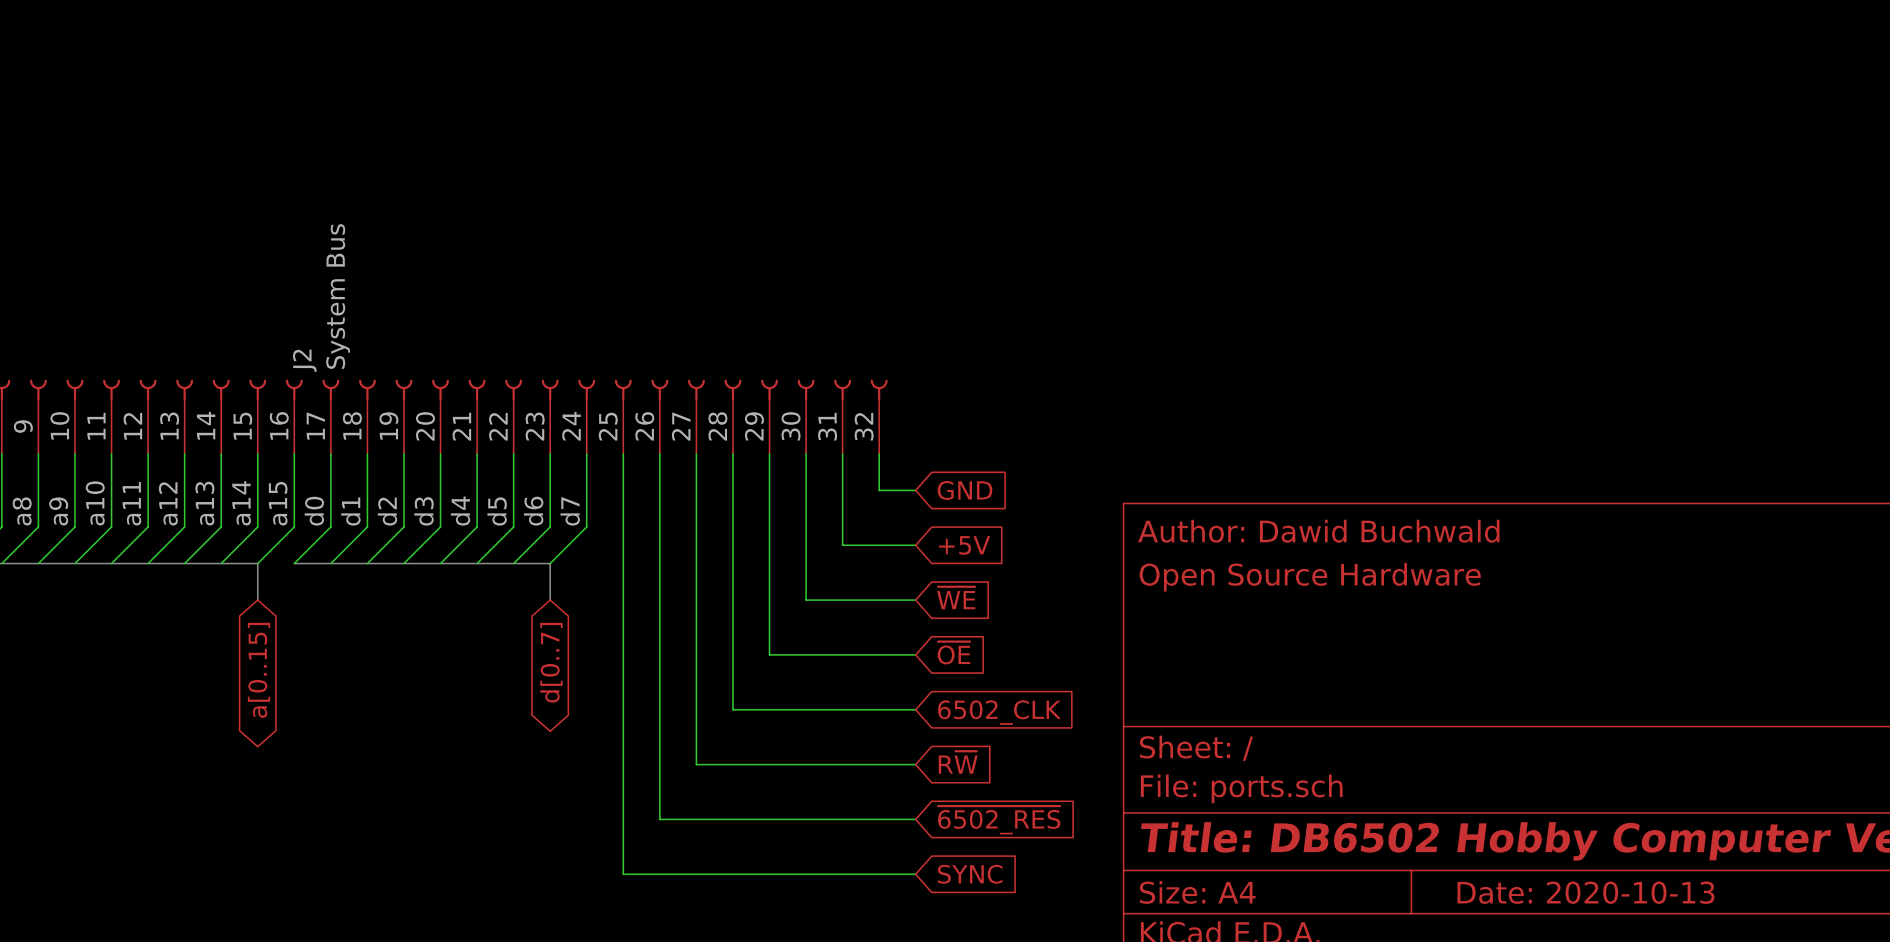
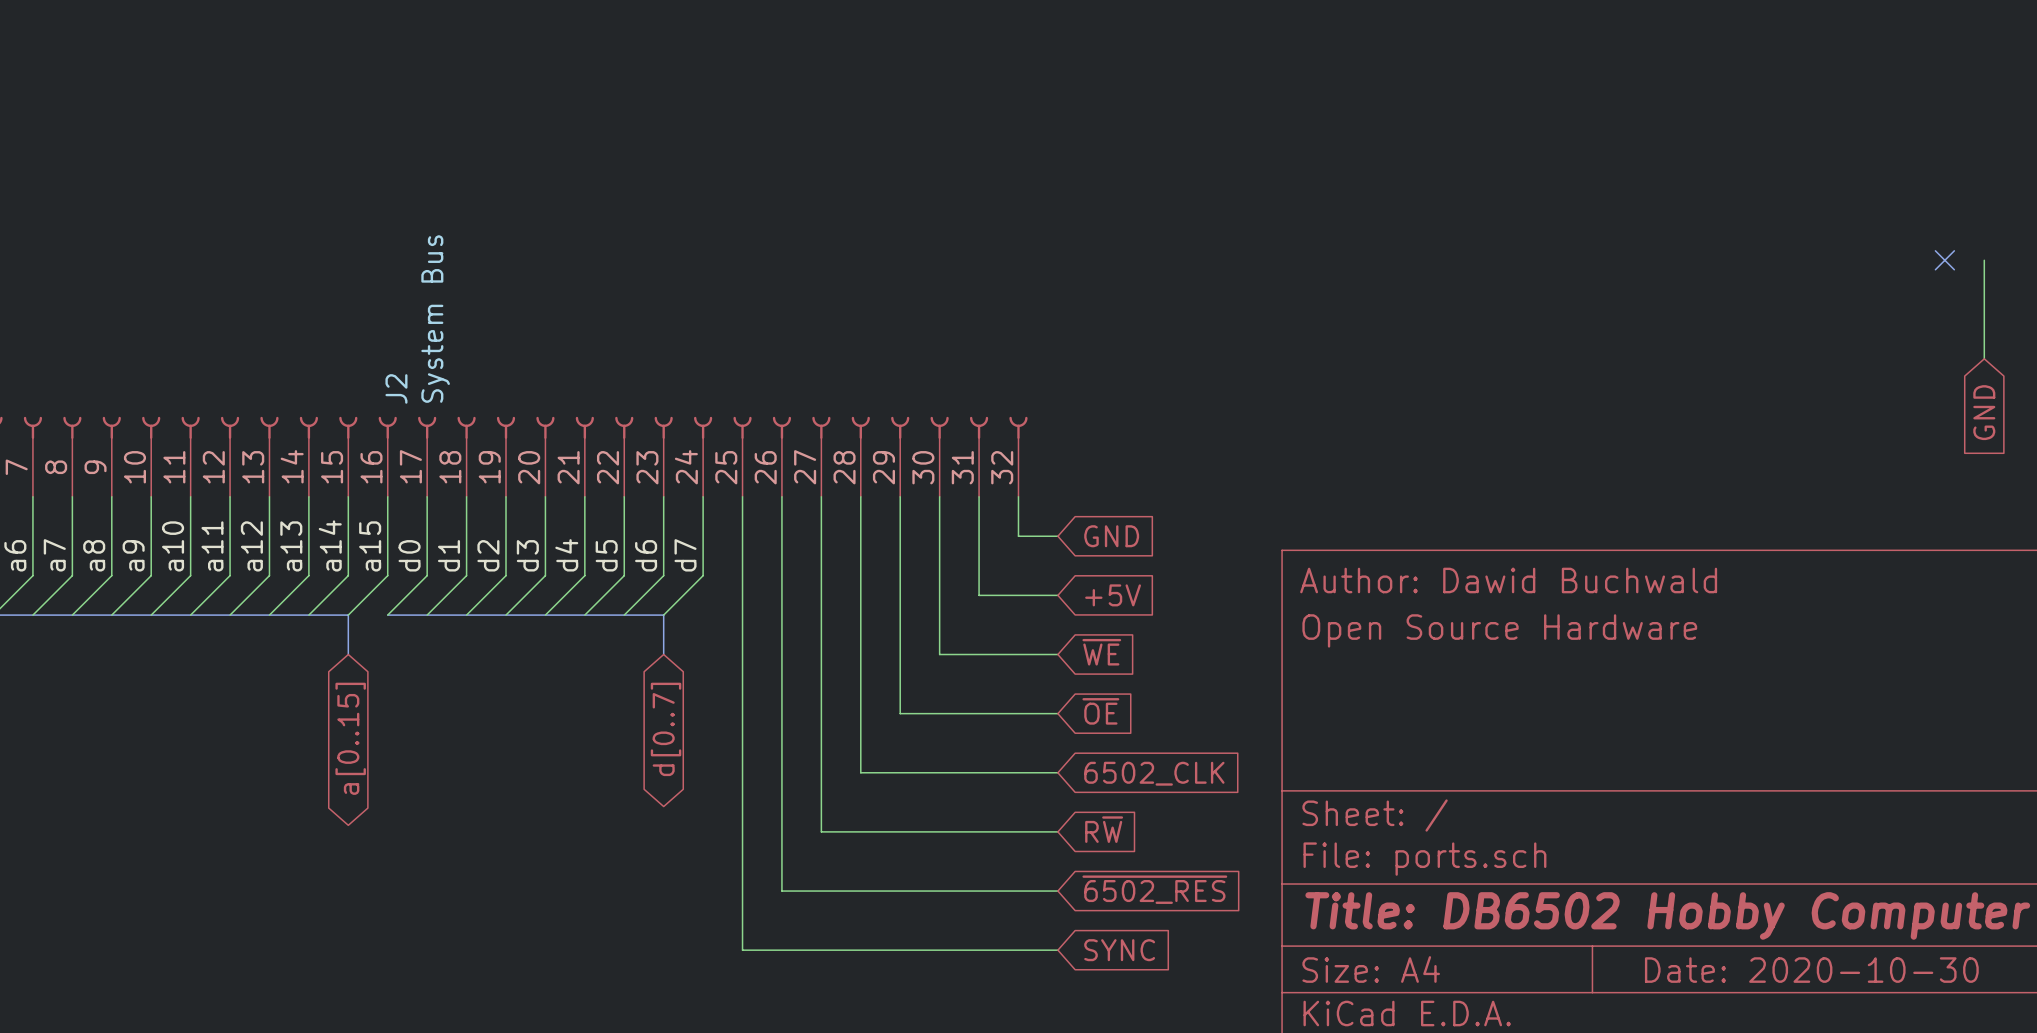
no-connect mark: none -> (1944, 260)
wire: none -> (1984, 260) (1984, 358)
global label: none -> GND (1984, 412)
title block: Date: 2020-10-13 (1585, 892) -> Date: 2020-10-30 (1811, 970)

